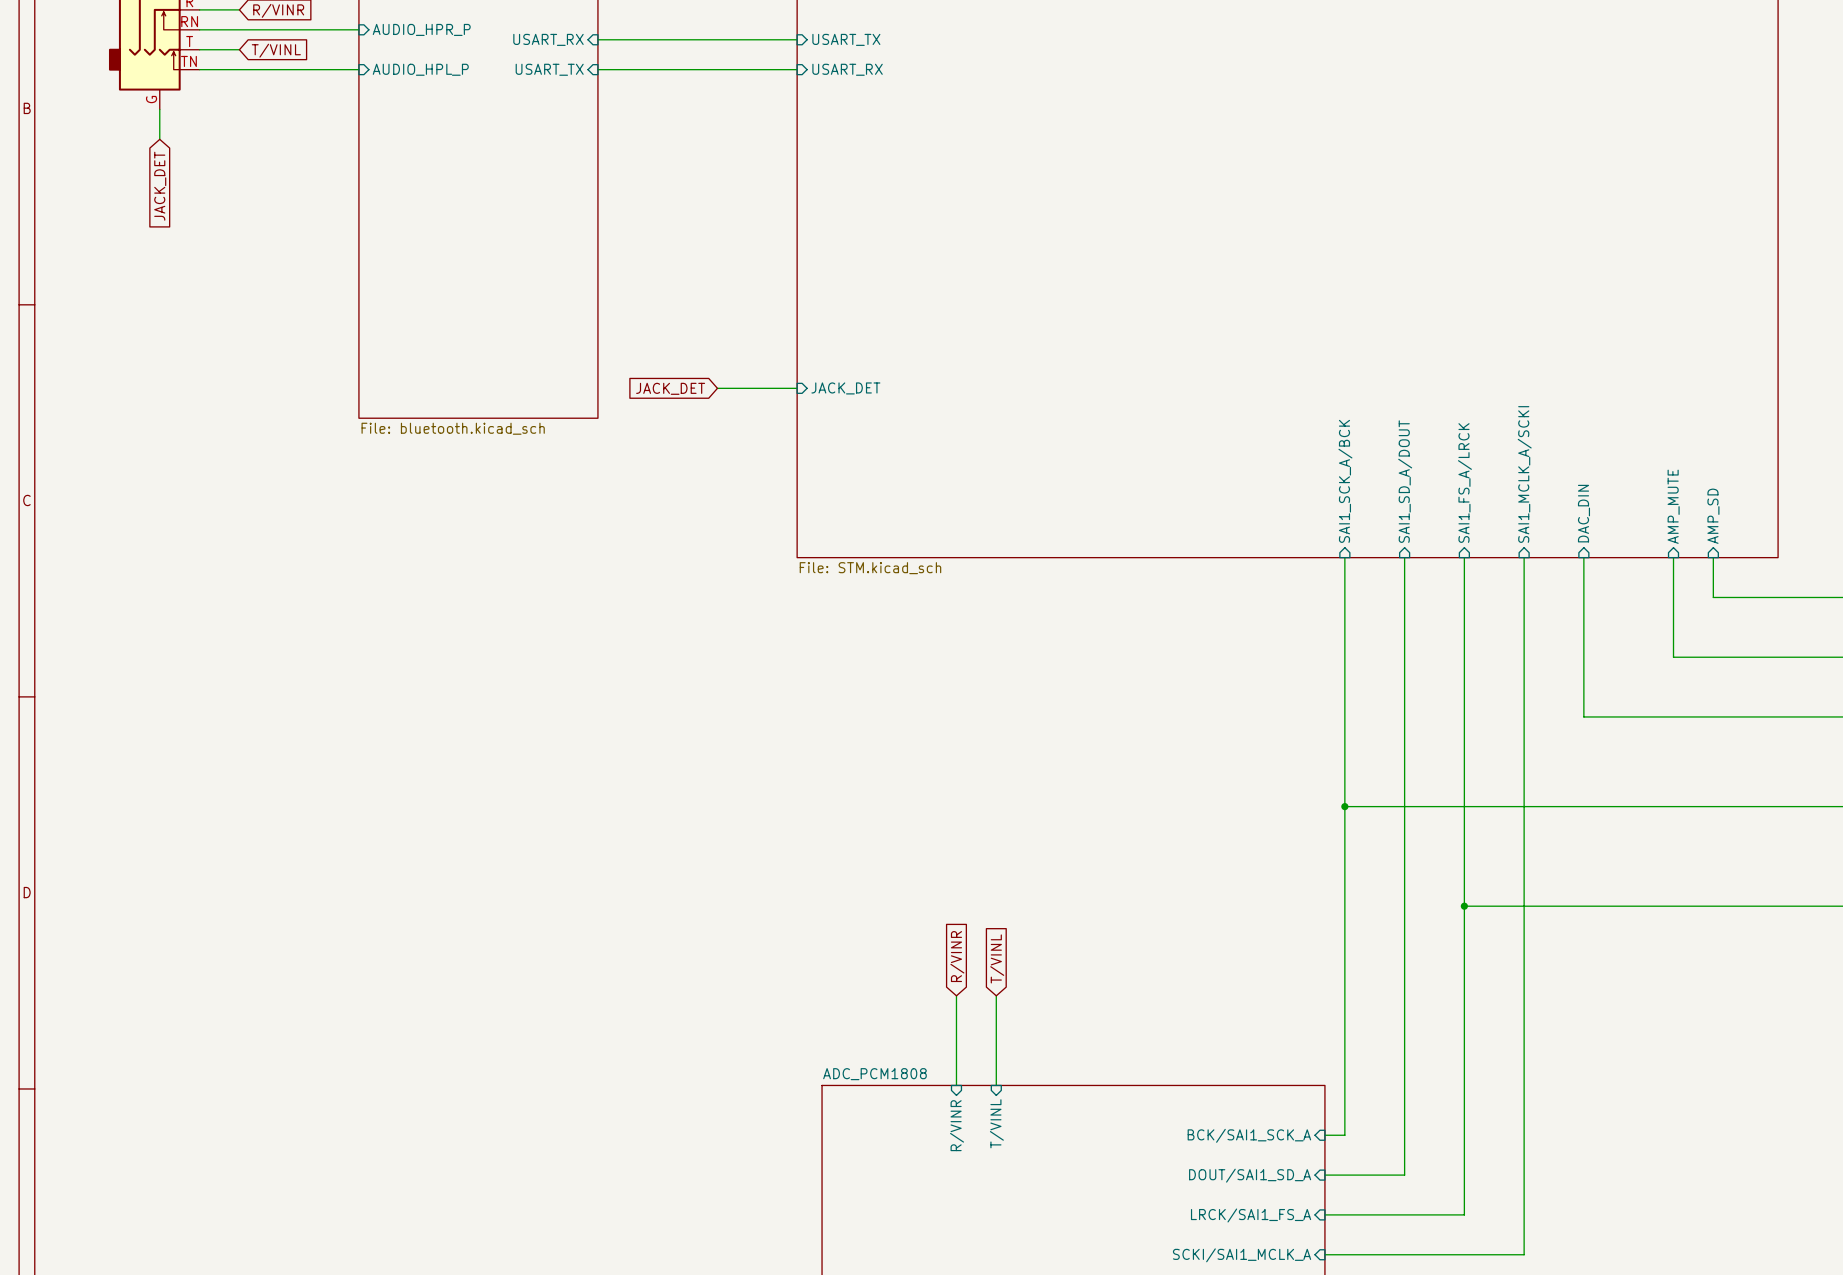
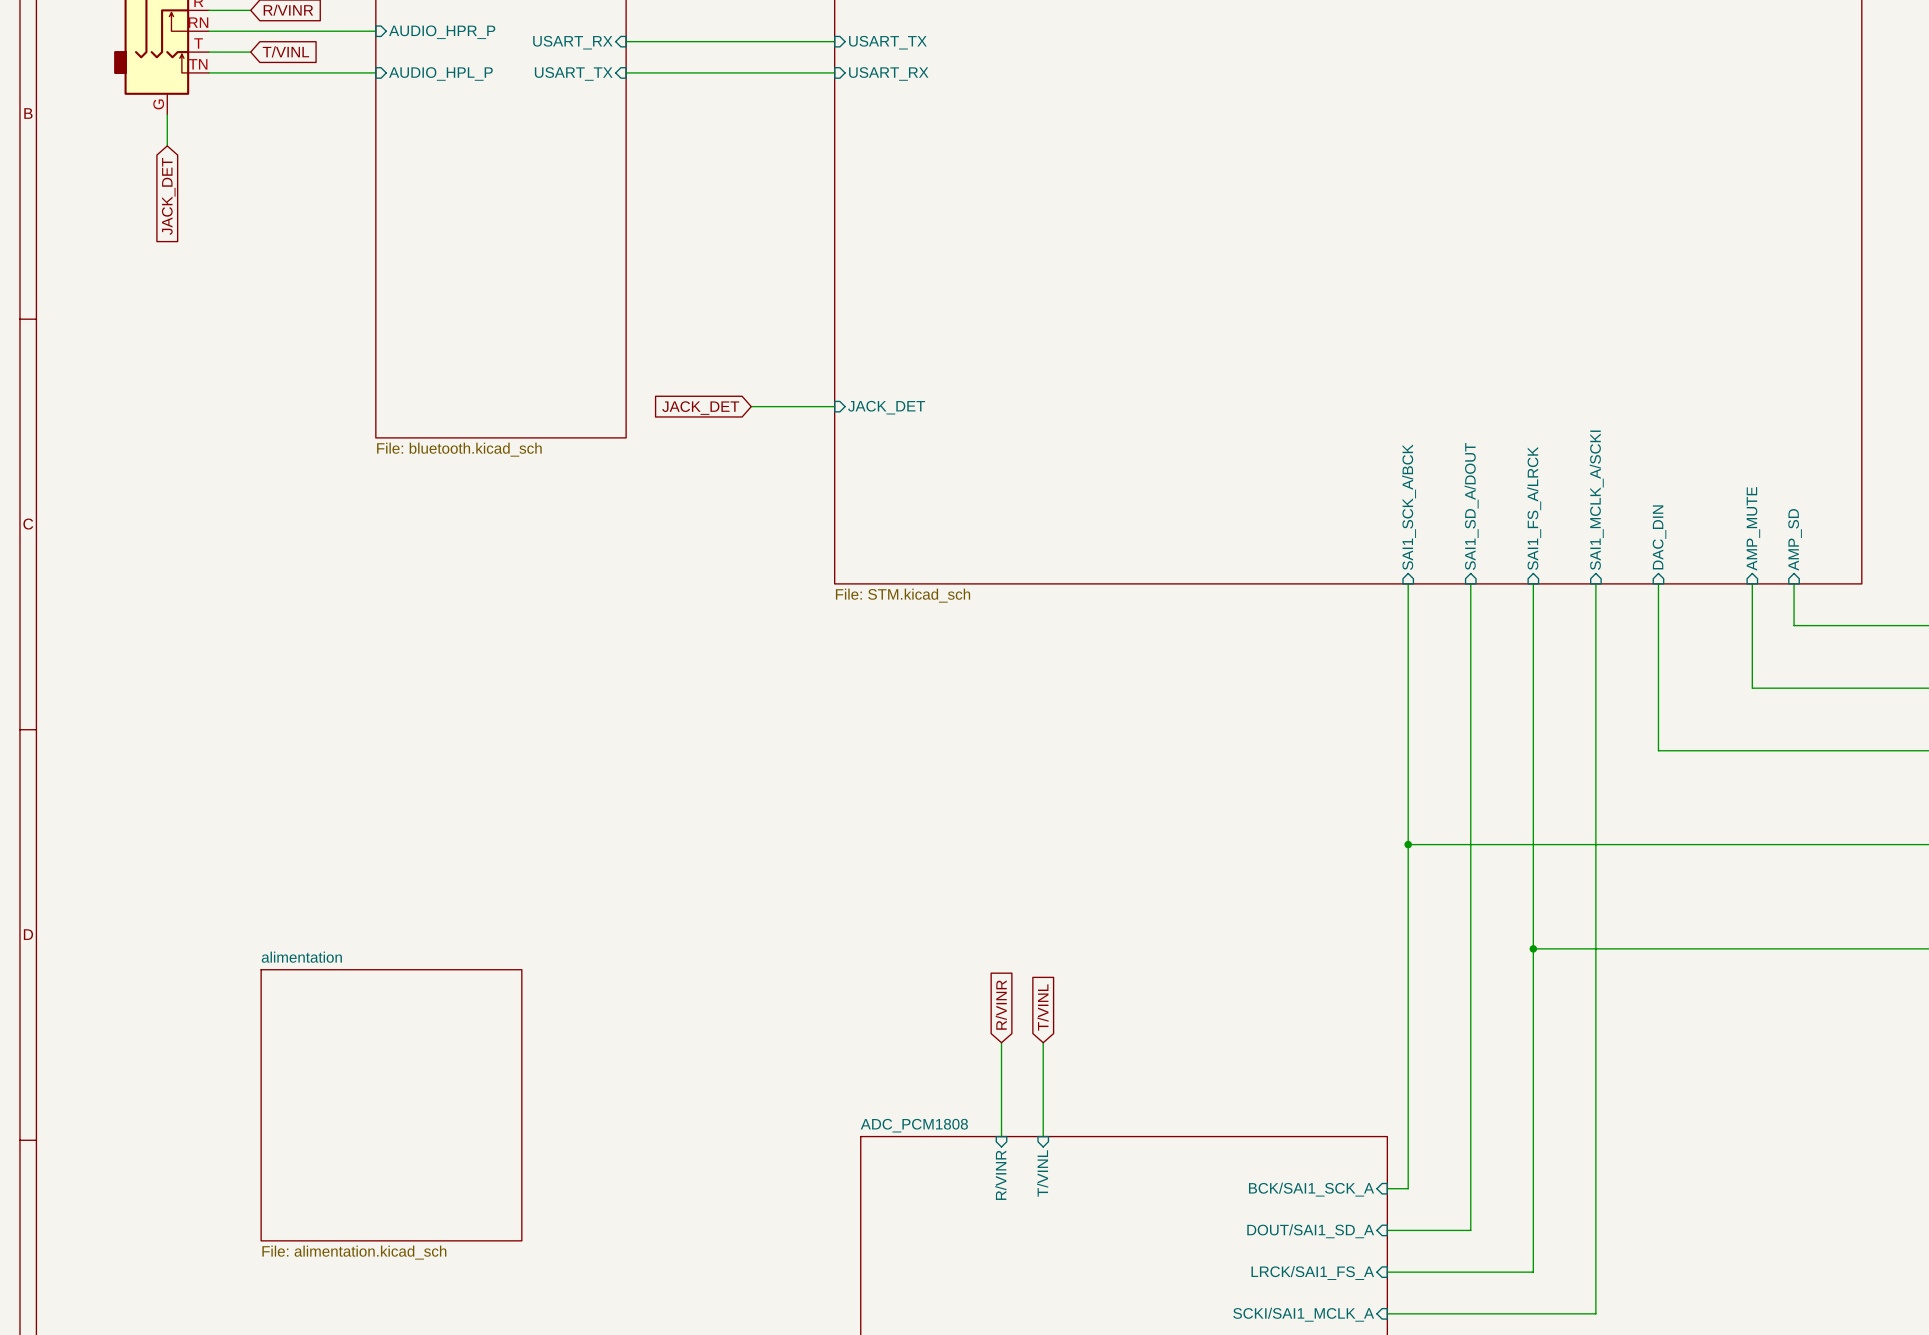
sheet alimentation: none -> File: alimentation.kicad_sch (391, 1105)

